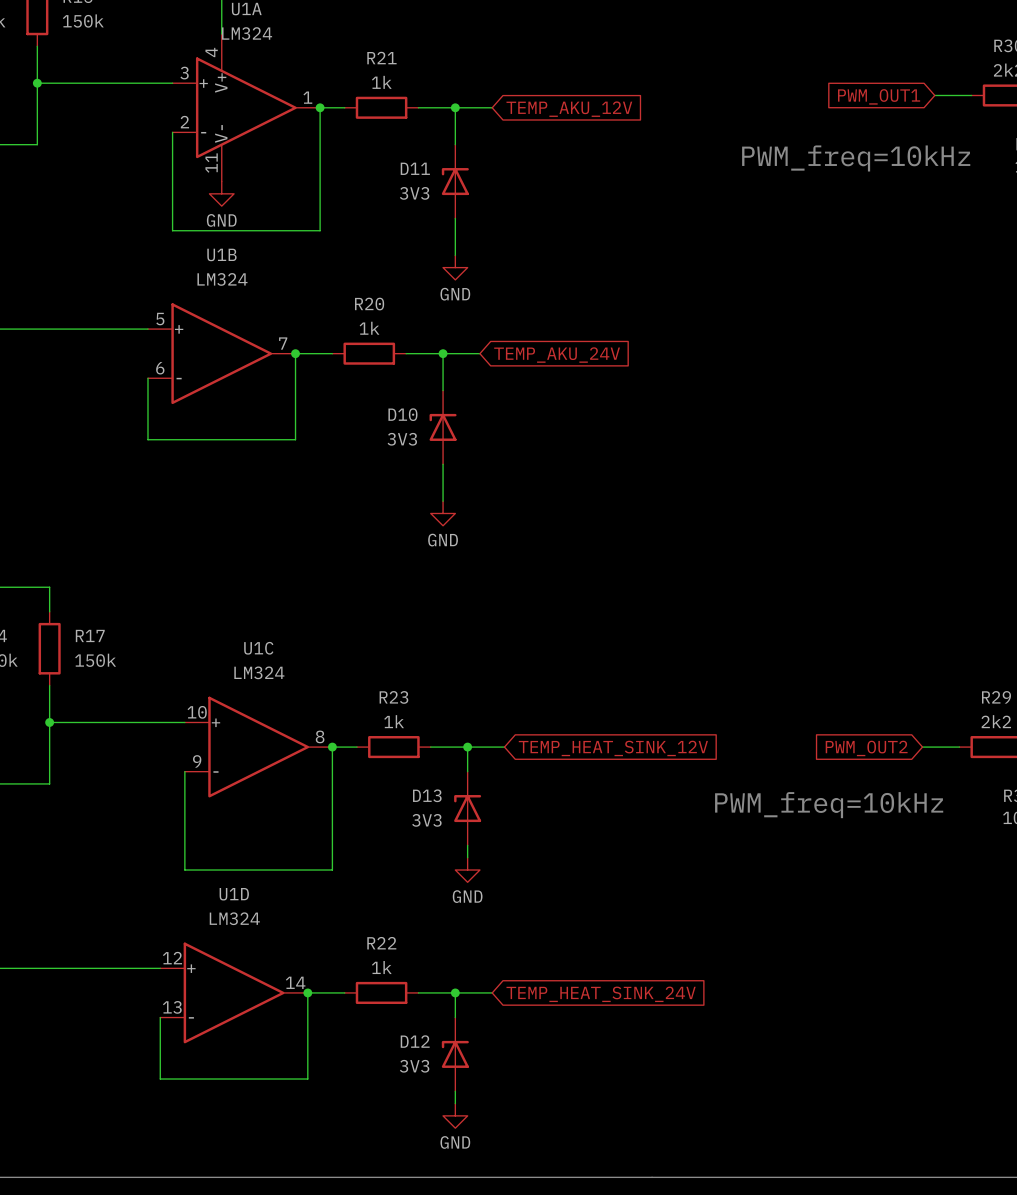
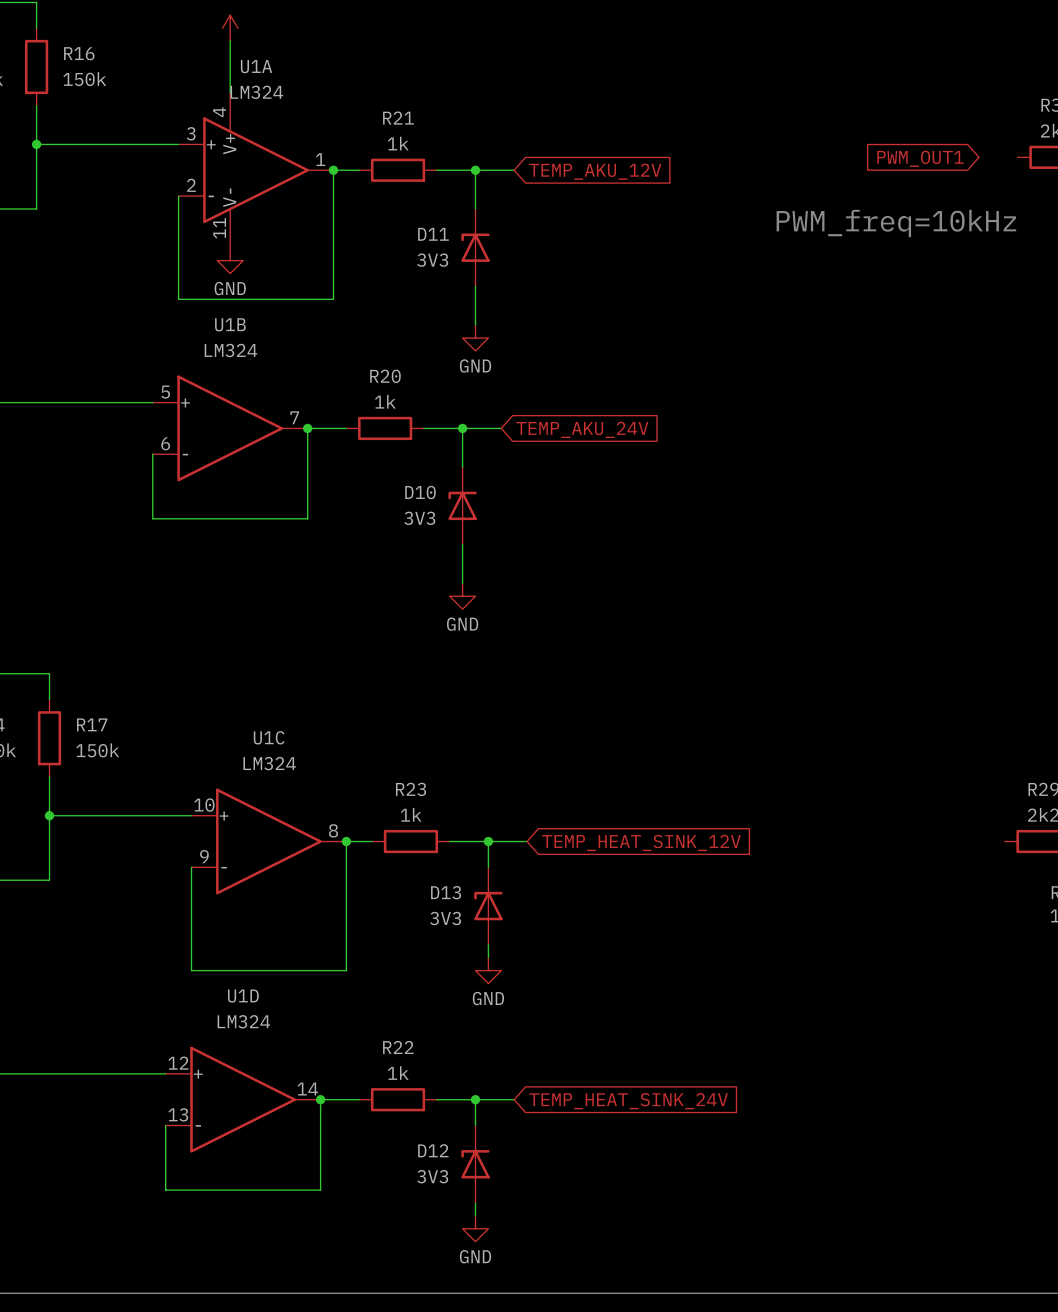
wire: (934, 95) (971, 95) -> none
wire: (922, 747) (959, 747) -> none
global label: PWM_OUT2 (866, 748) -> none
text: PWM_freq=10kHz (829, 805) -> none

